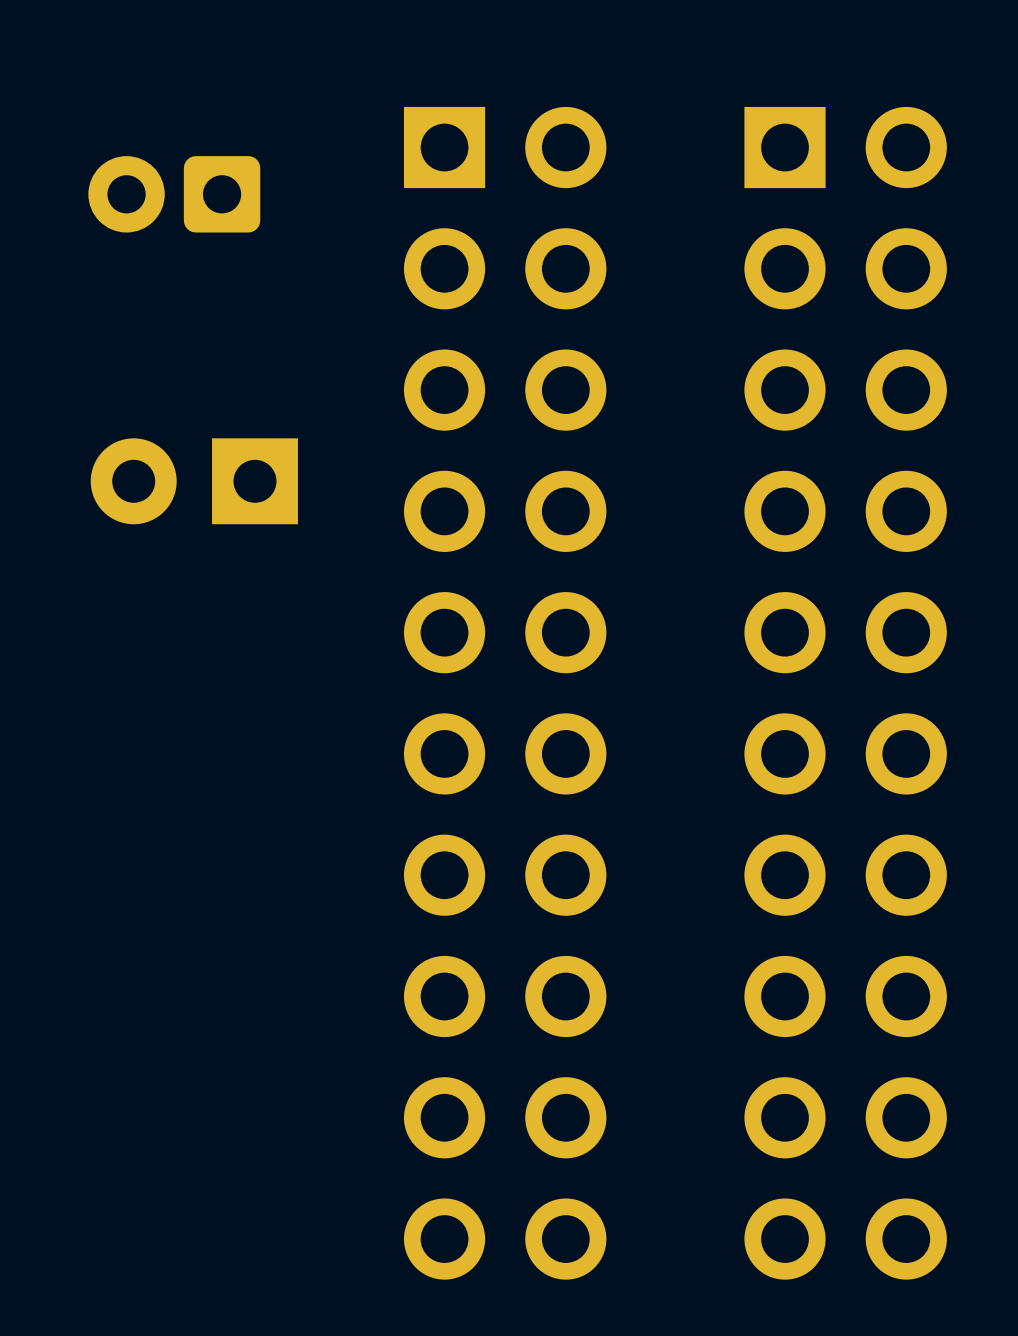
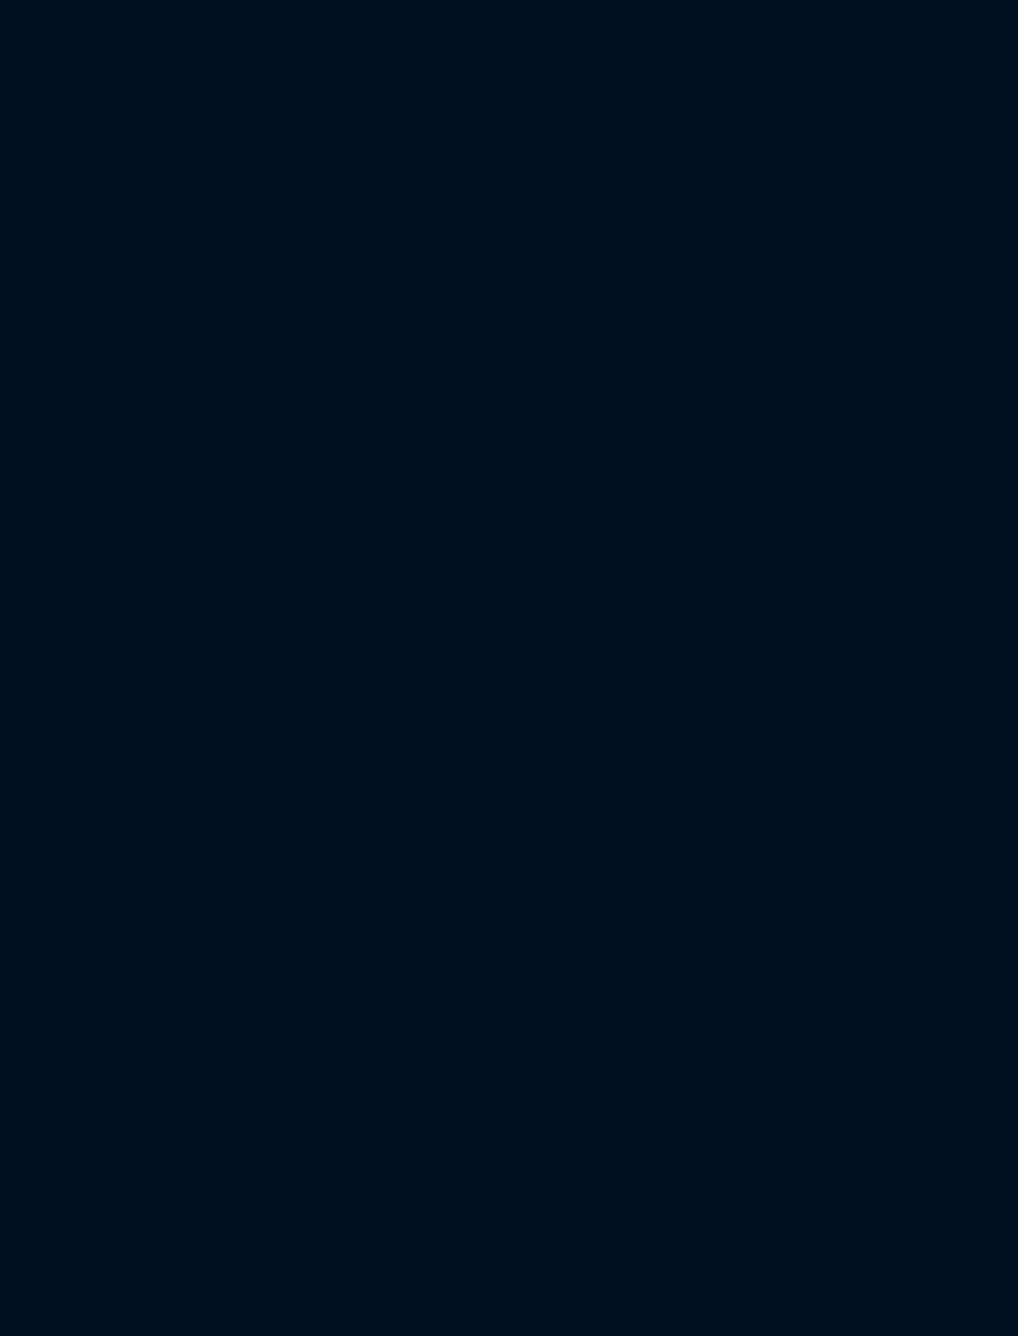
part: (174, 194) -> none
part: (194, 481) -> none
part: (505, 693) -> none
part: (845, 693) -> none

